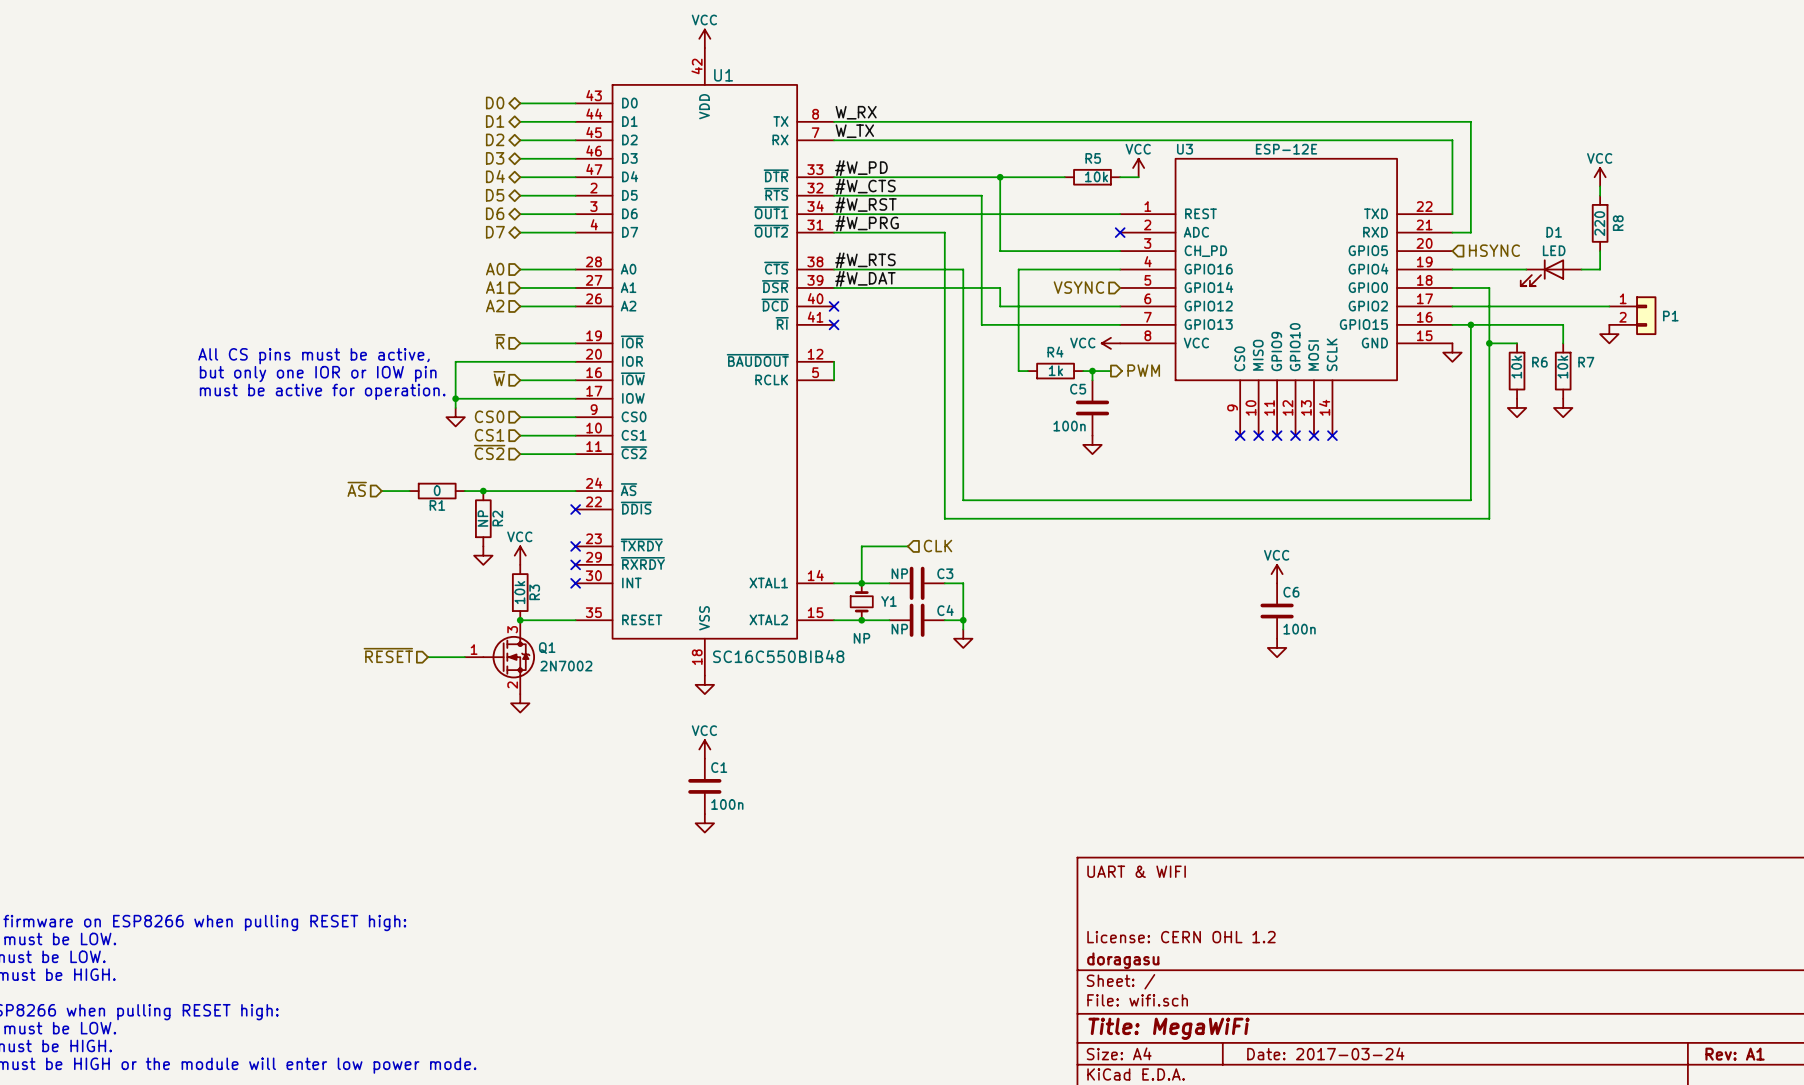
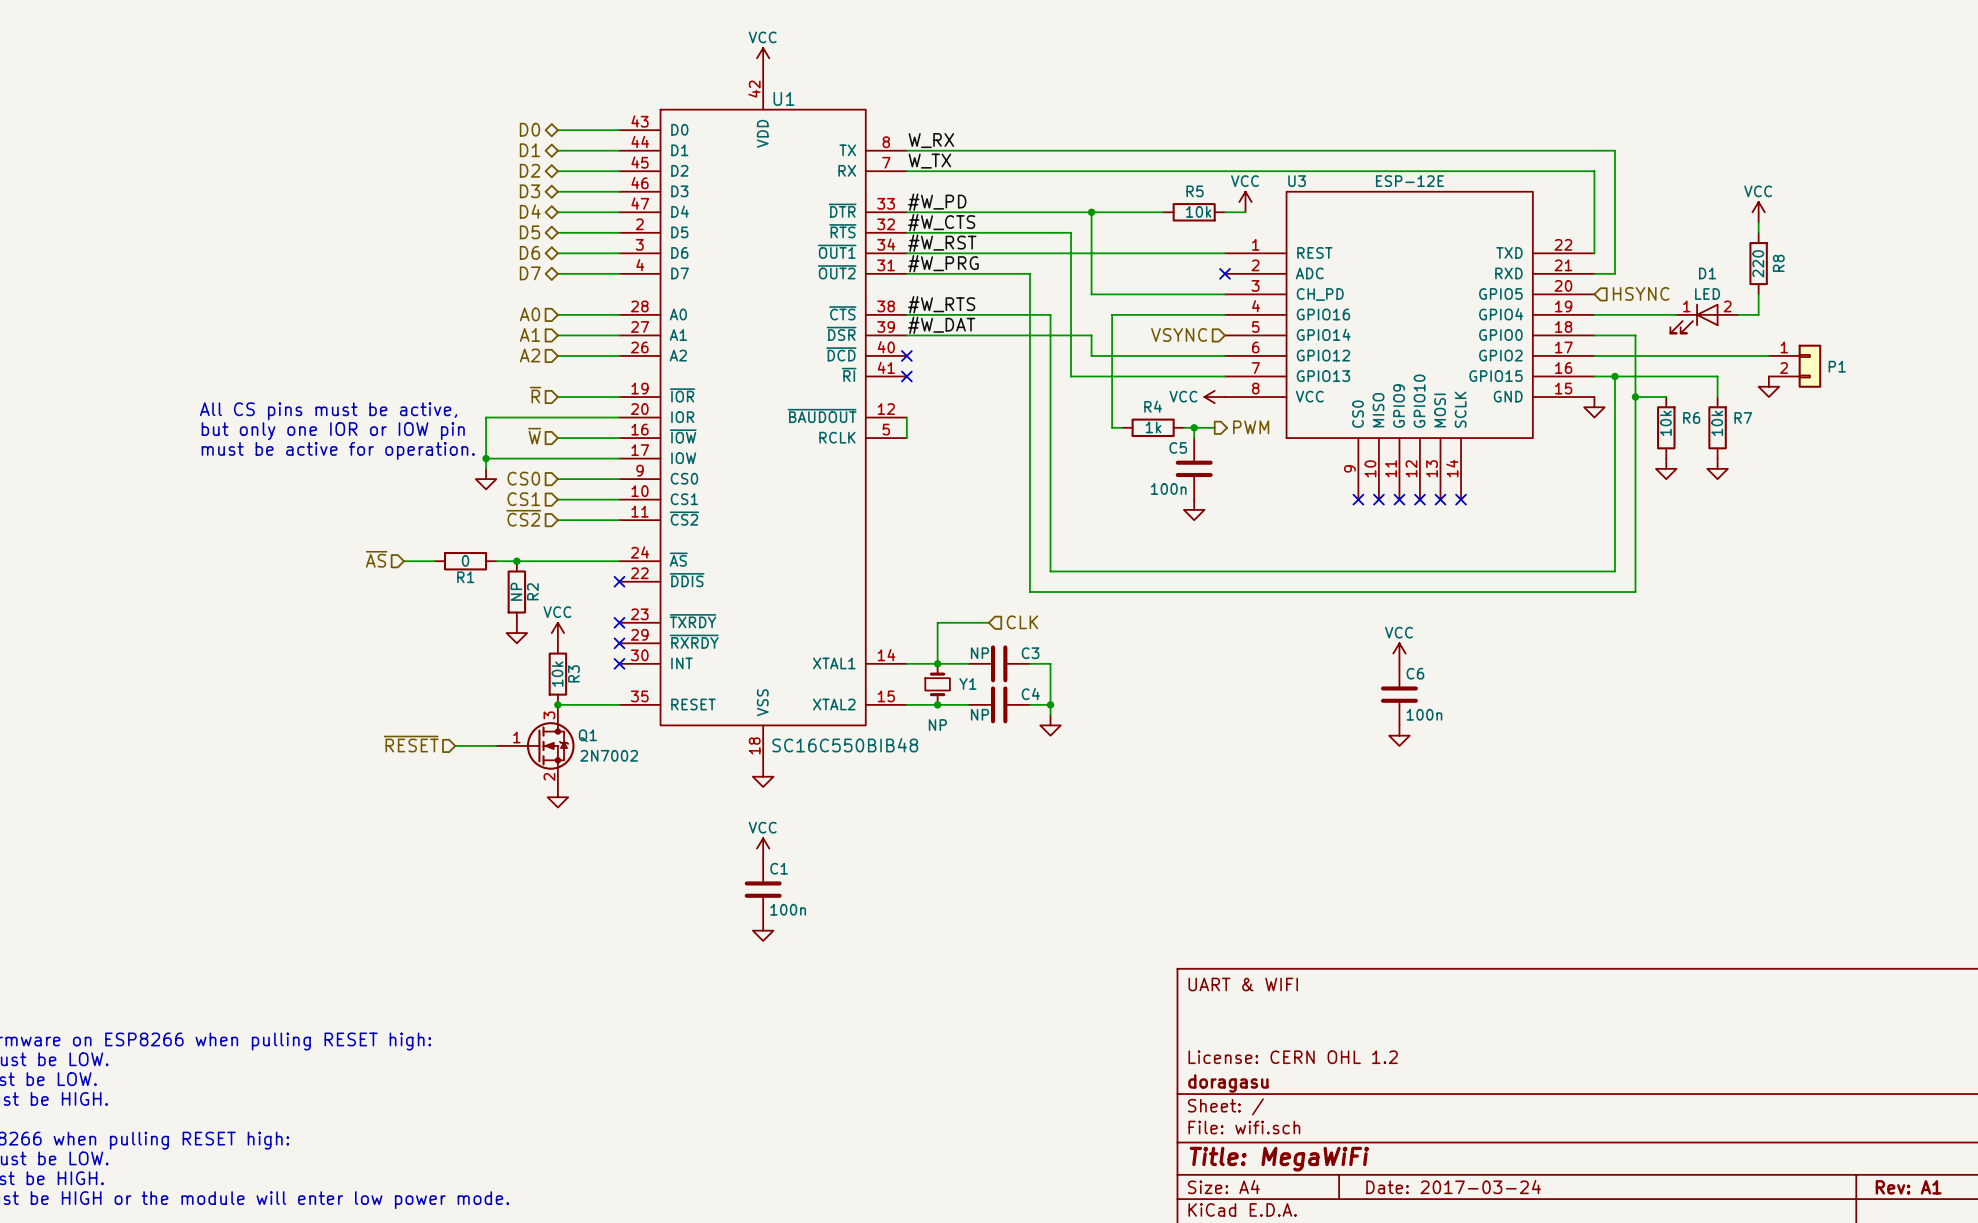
D1 symbol: [1520, 259, 1582, 287] -> [1670, 303, 1739, 334]
Q1 symbol: [464, 620, 536, 695] -> [496, 704, 575, 787]

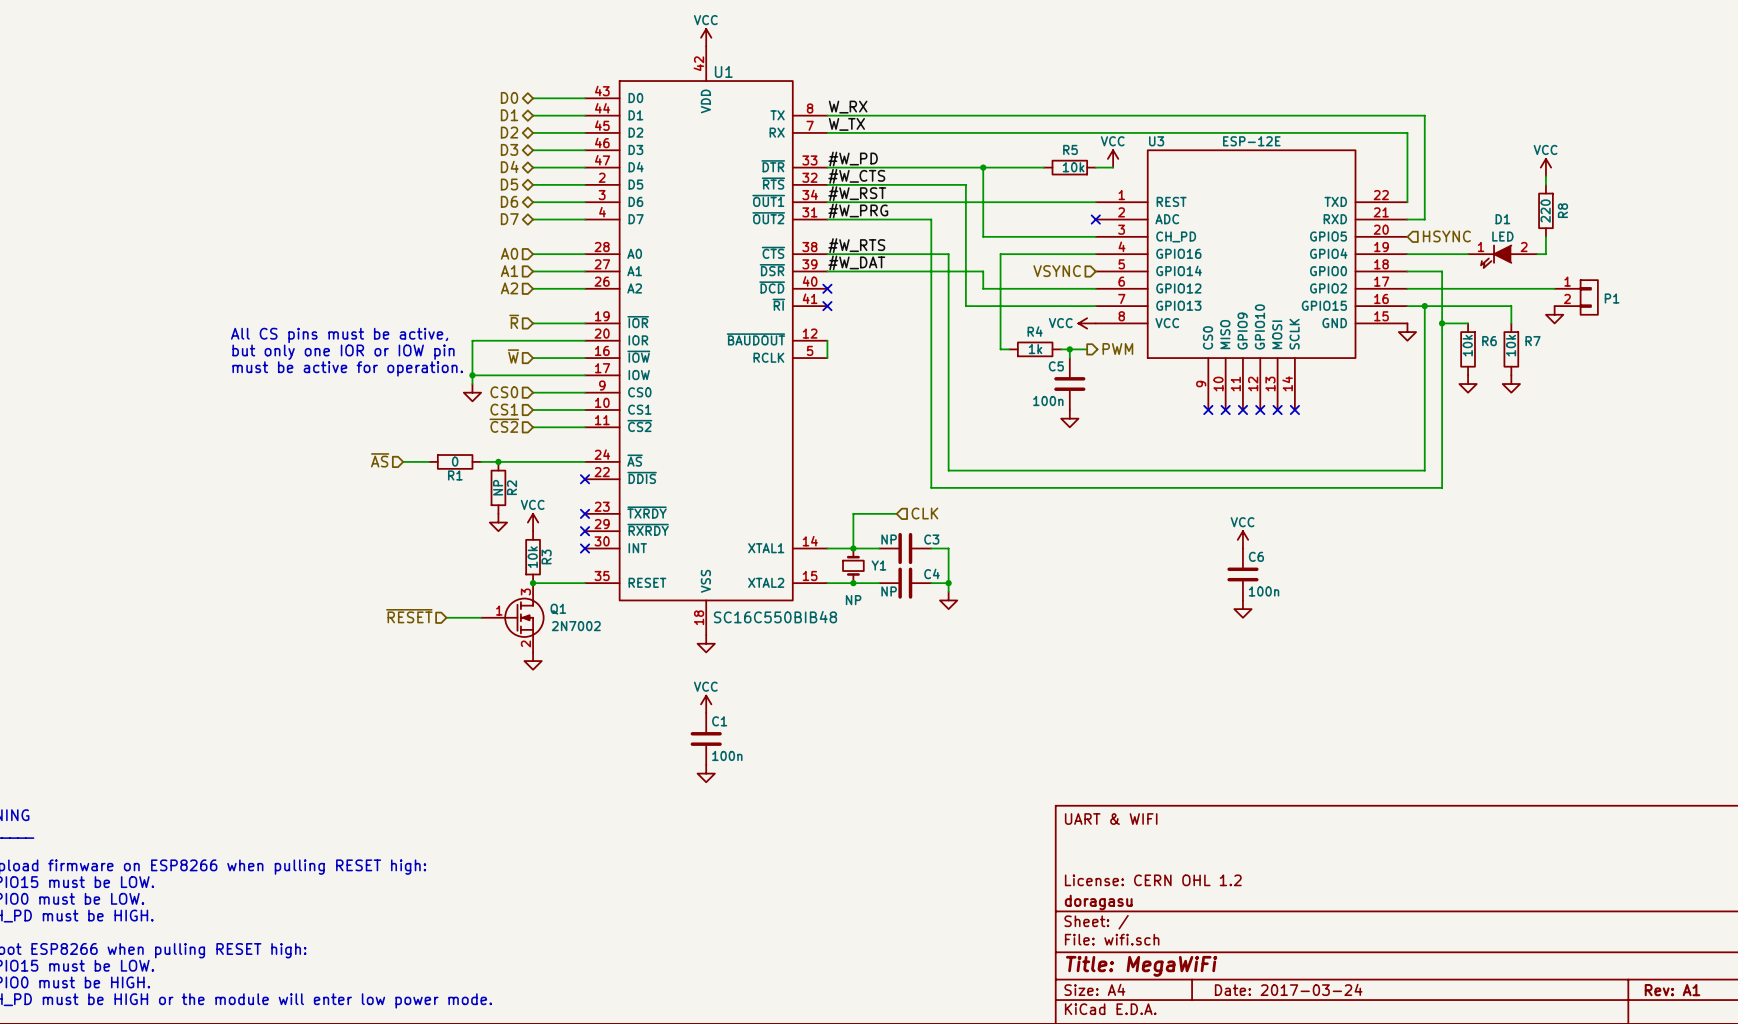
D1 symbol: [1670, 303, 1739, 334] -> [1468, 245, 1538, 269]
P1 symbol: [1768, 344, 1822, 388] -> [1554, 280, 1598, 315]
Q1 symbol: [496, 704, 575, 787] -> [481, 583, 545, 653]

